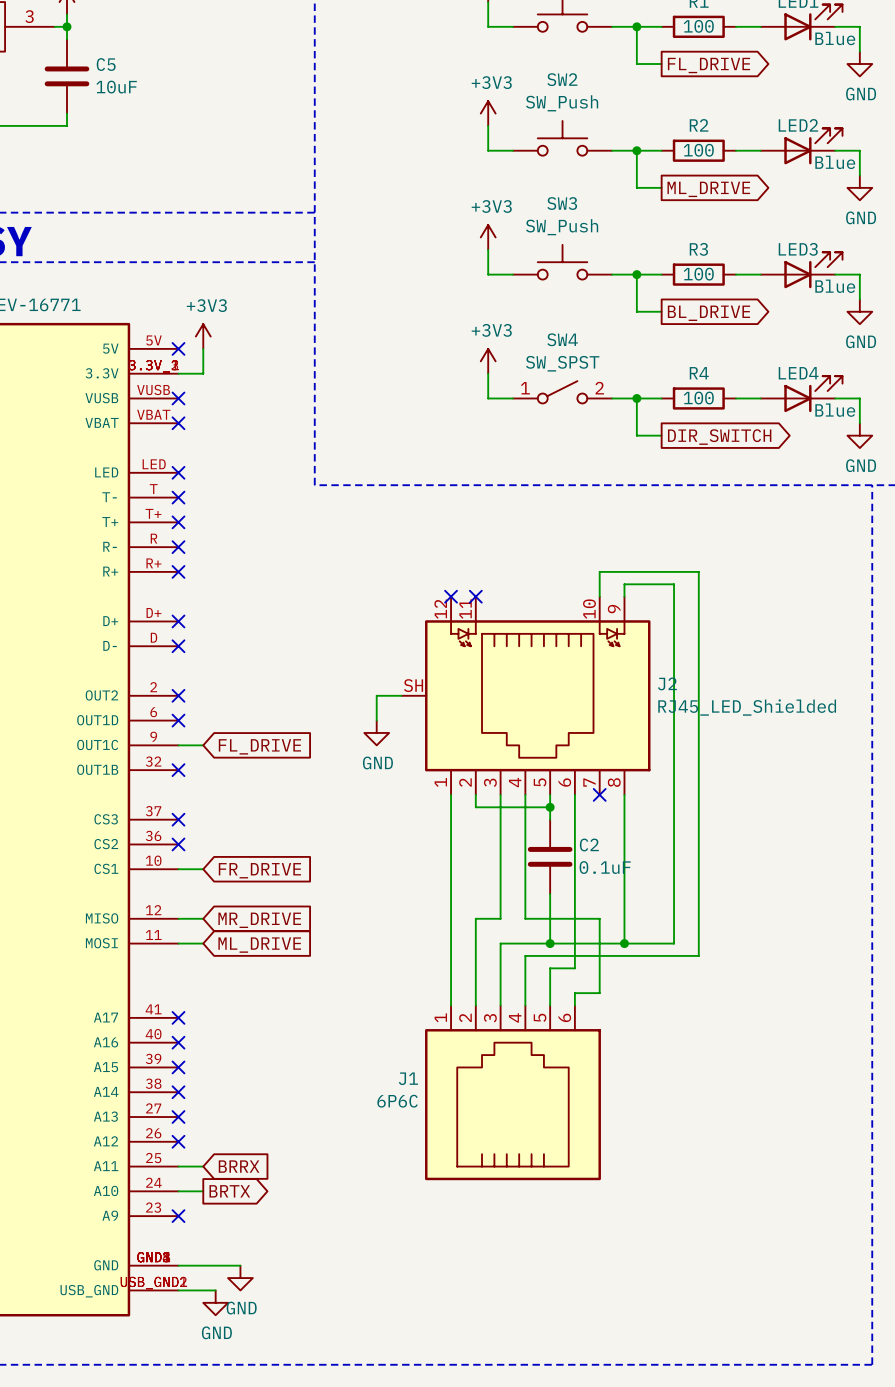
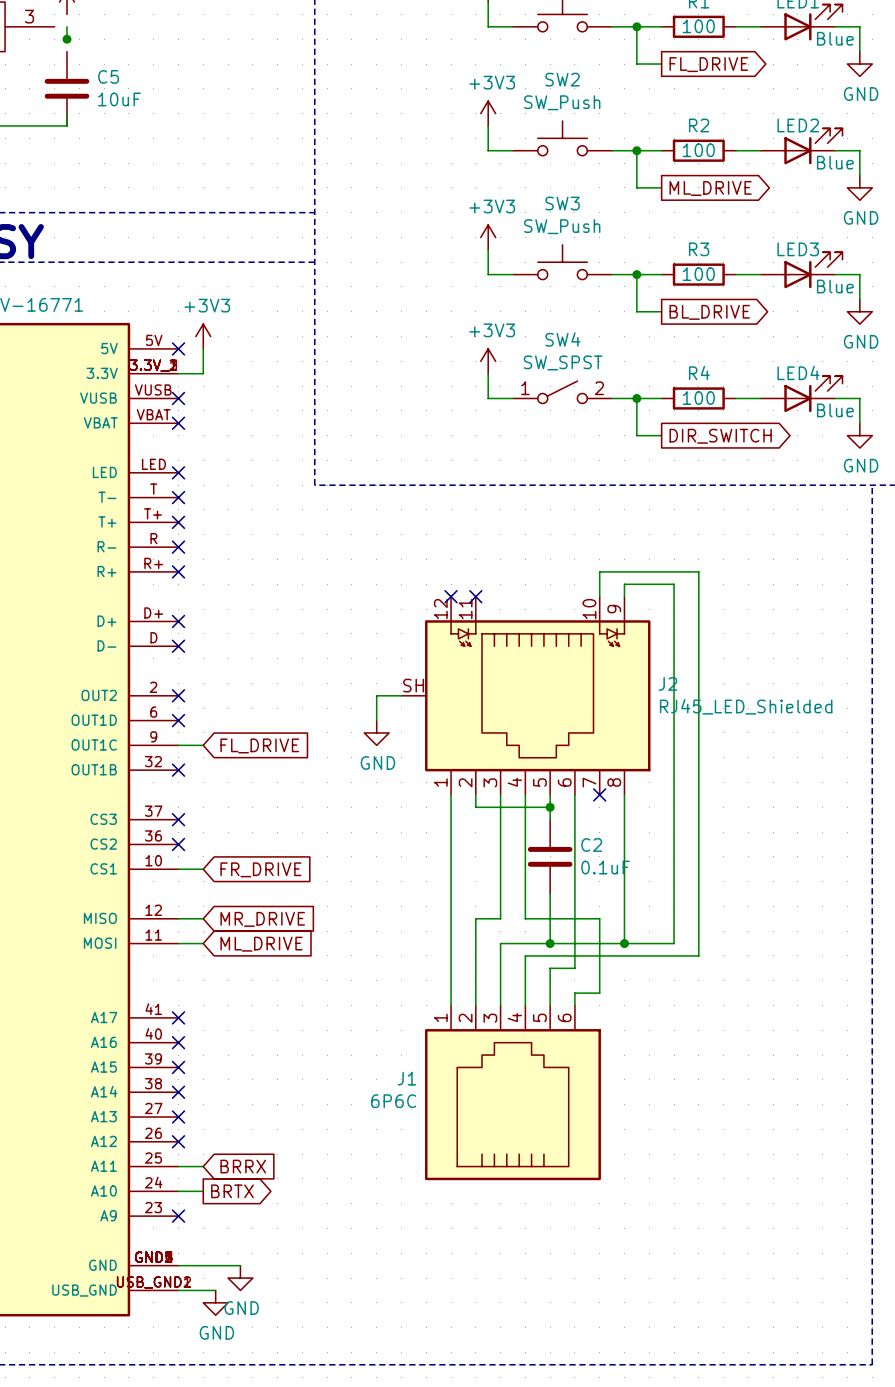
wire: (67, 14) (67, 26) (54, 26) -> none
junction position: (67, 26) -> (67, 39)
C5 position: (67, 76) -> (67, 88)

